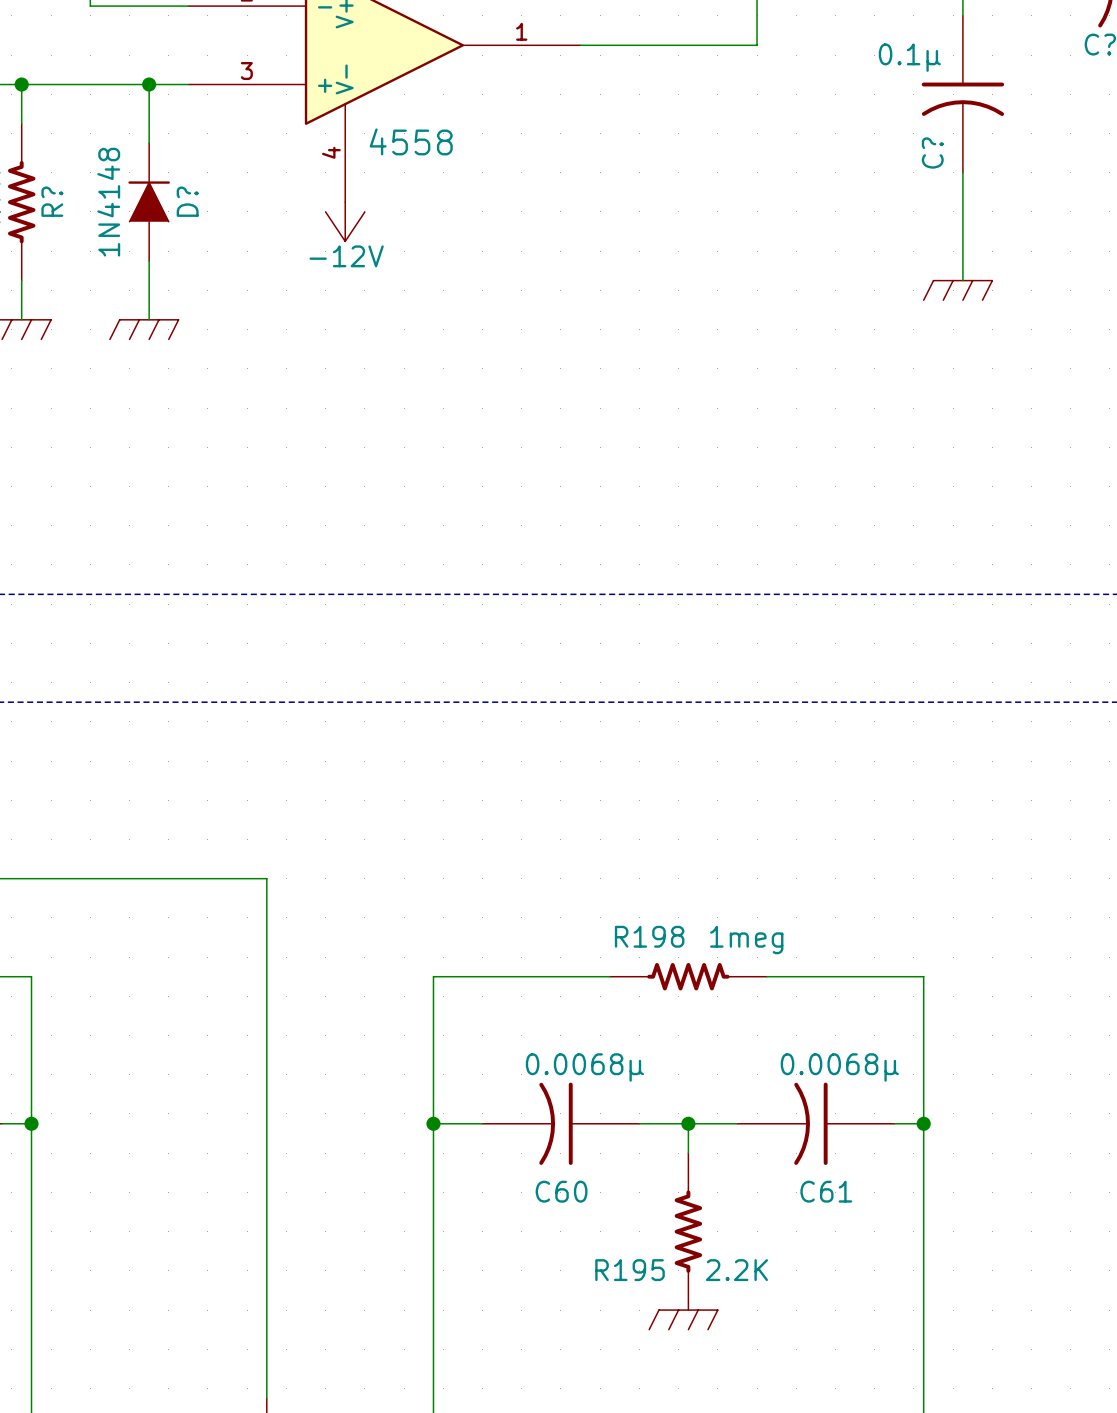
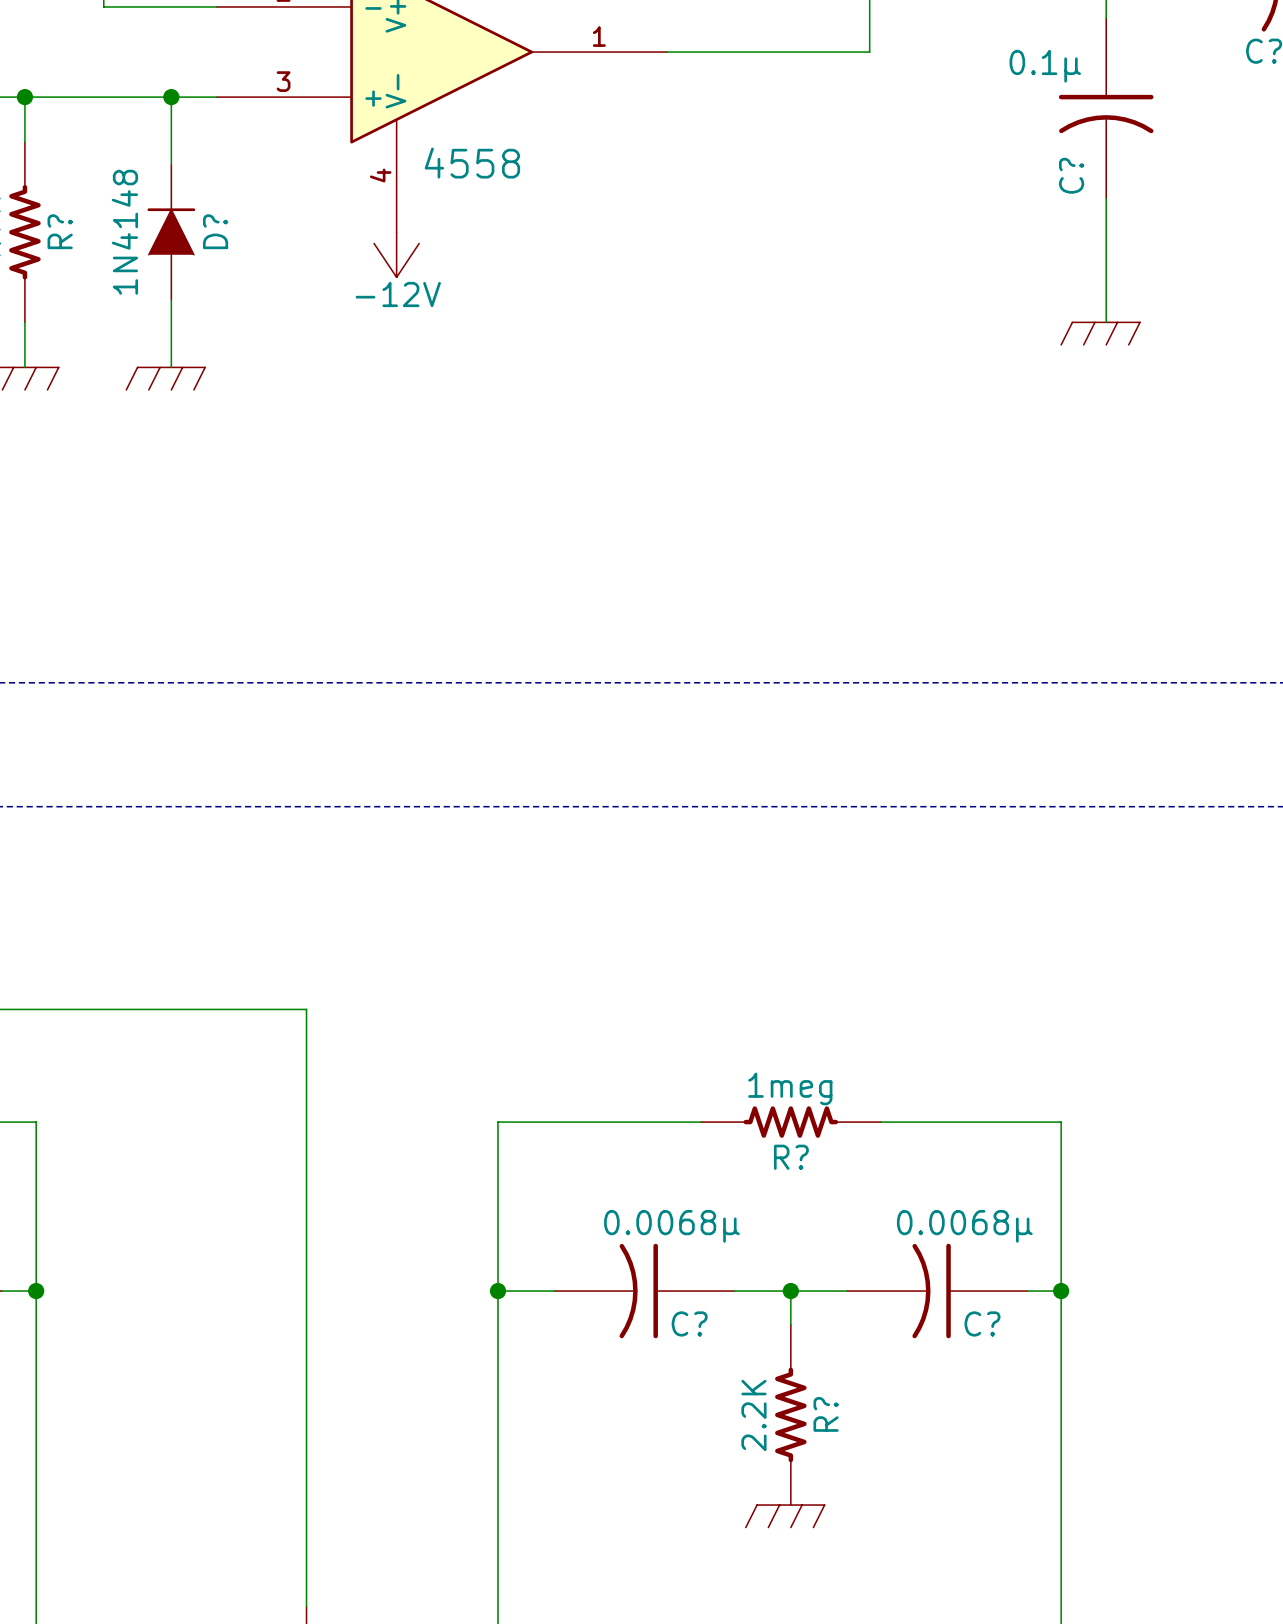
R198 name: R198 (649, 936) -> R? (791, 1157)
R198 value position: 1meg (746, 940) -> 1meg (790, 1088)
C60 name: C60 (561, 1191) -> C? (689, 1323)
C61 name: C61 (826, 1191) -> C? (982, 1323)
R195 name: R195 (630, 1270) -> R? (826, 1414)
R195 value rotation: 0° (736, 1270) -> 90° counterclockwise (753, 1415)
R195 value position: 2.2K (736, 1270) -> 2.2K (753, 1415)

